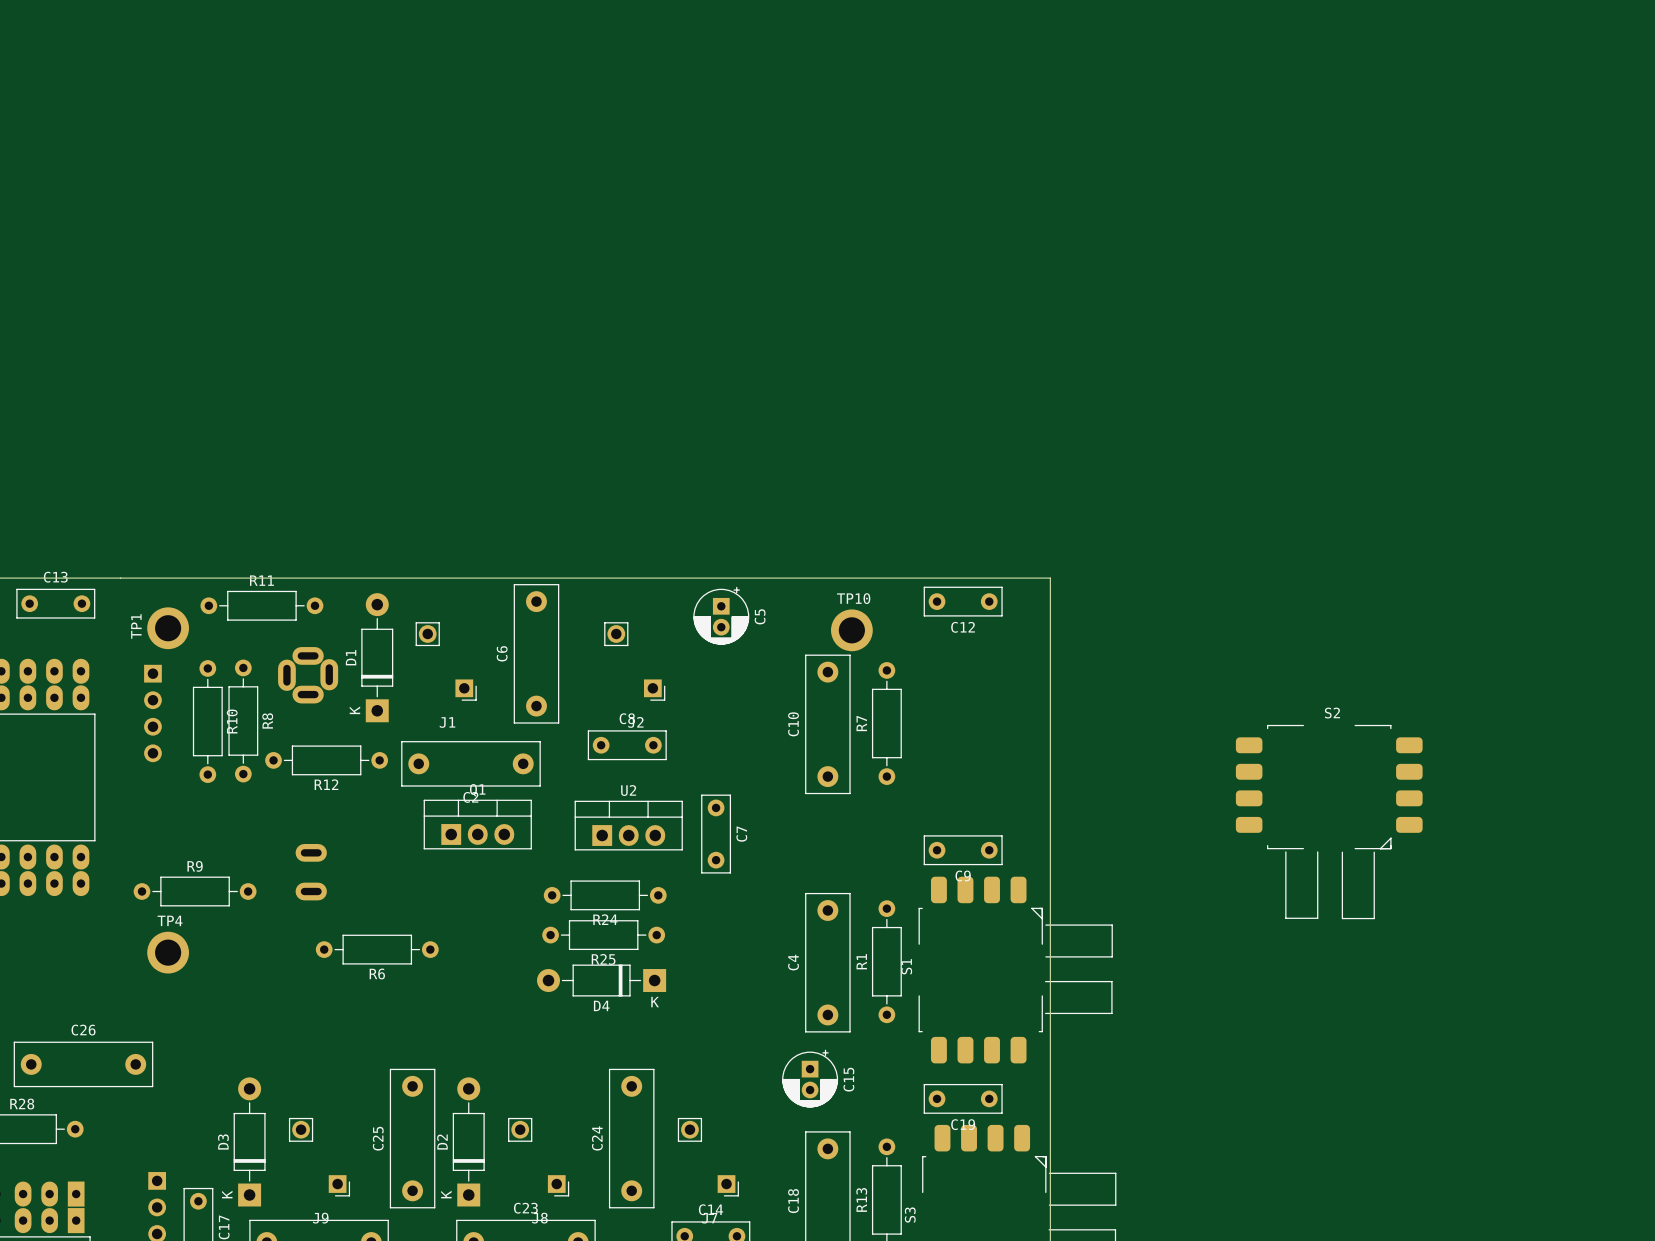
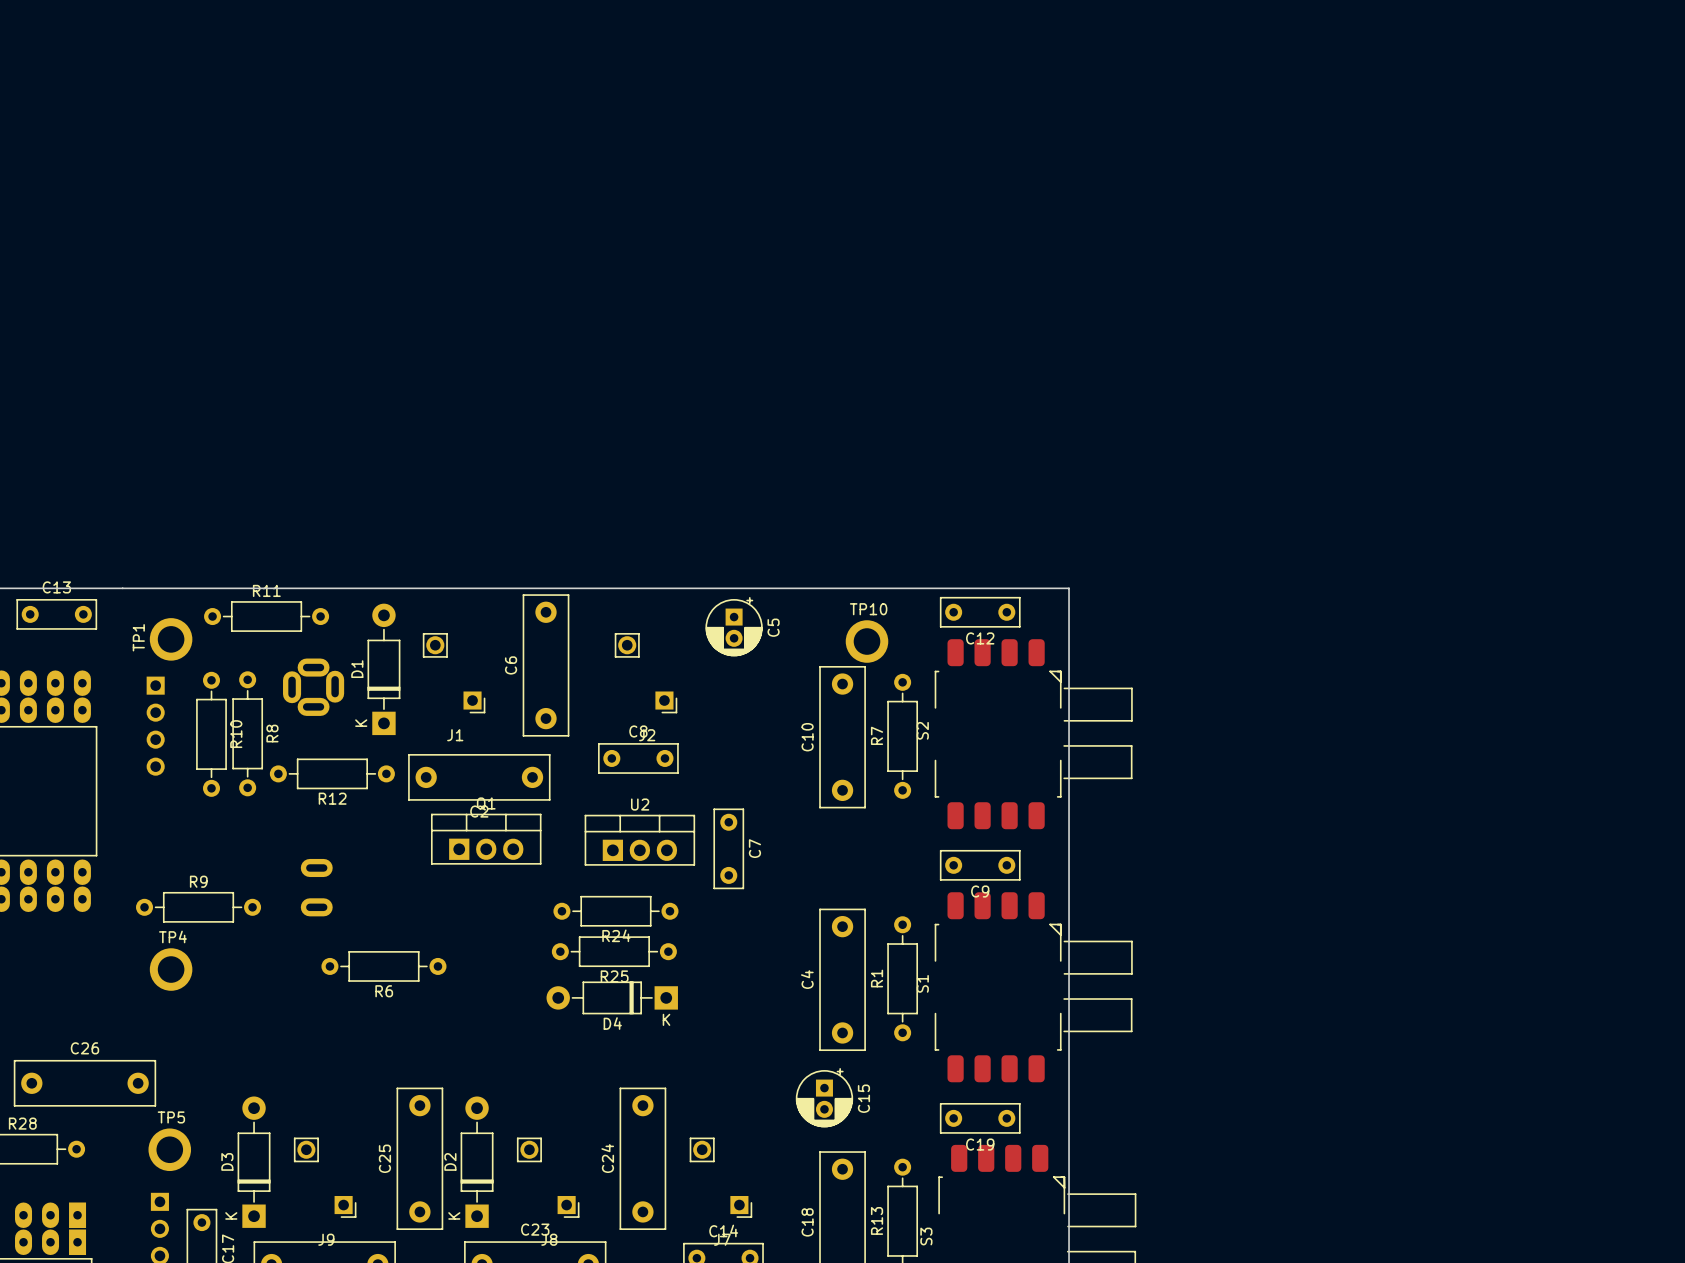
S2 rotation: 0° (1329, 822) -> 90° counterclockwise (1033, 734)
S2 position: (1329, 822) -> (1033, 734)
TP5: none -> (169, 1149)

